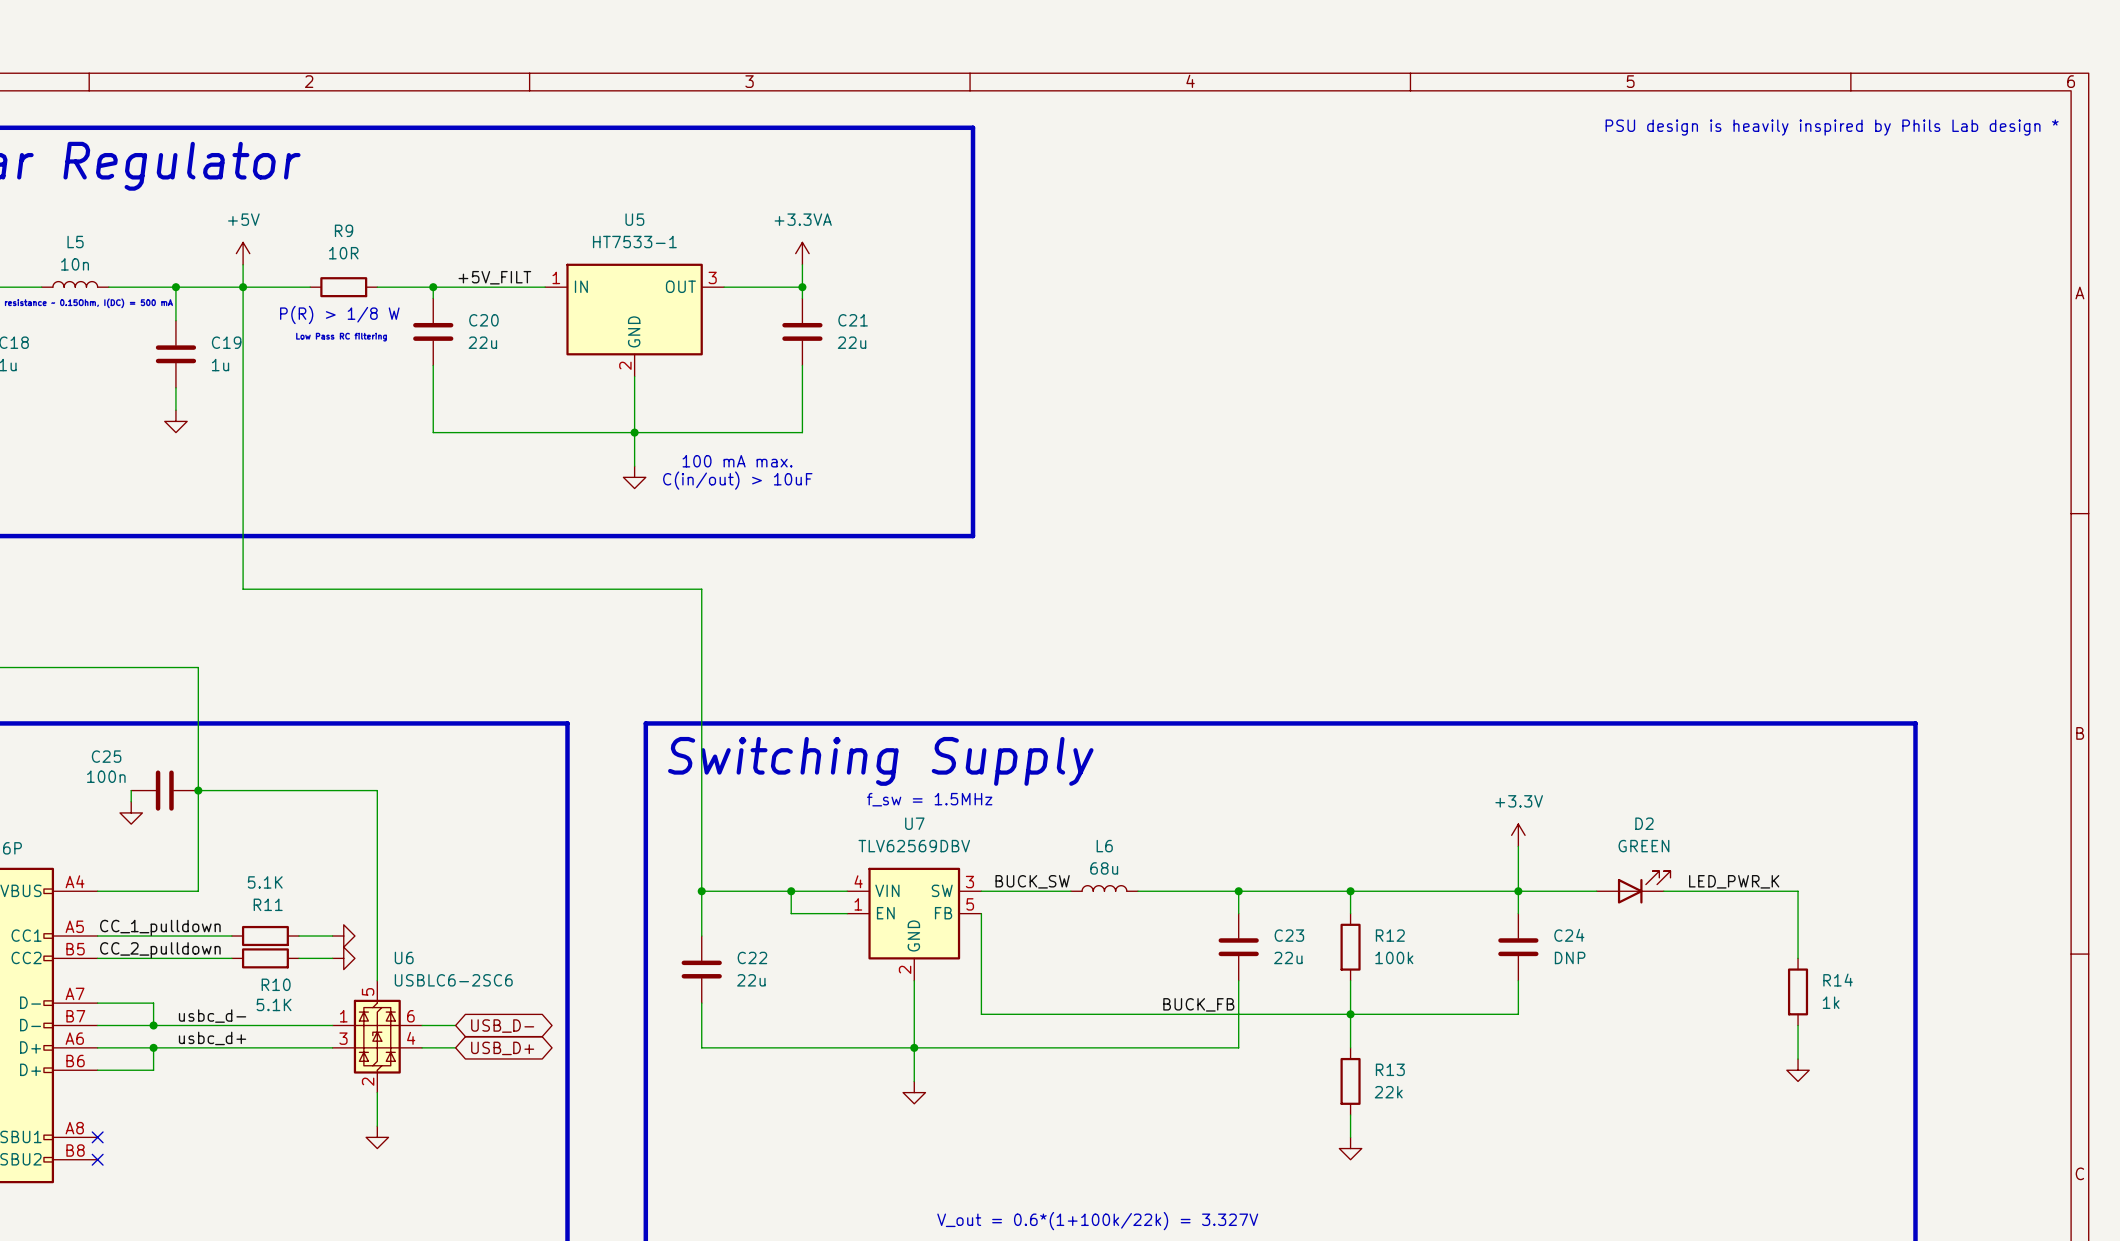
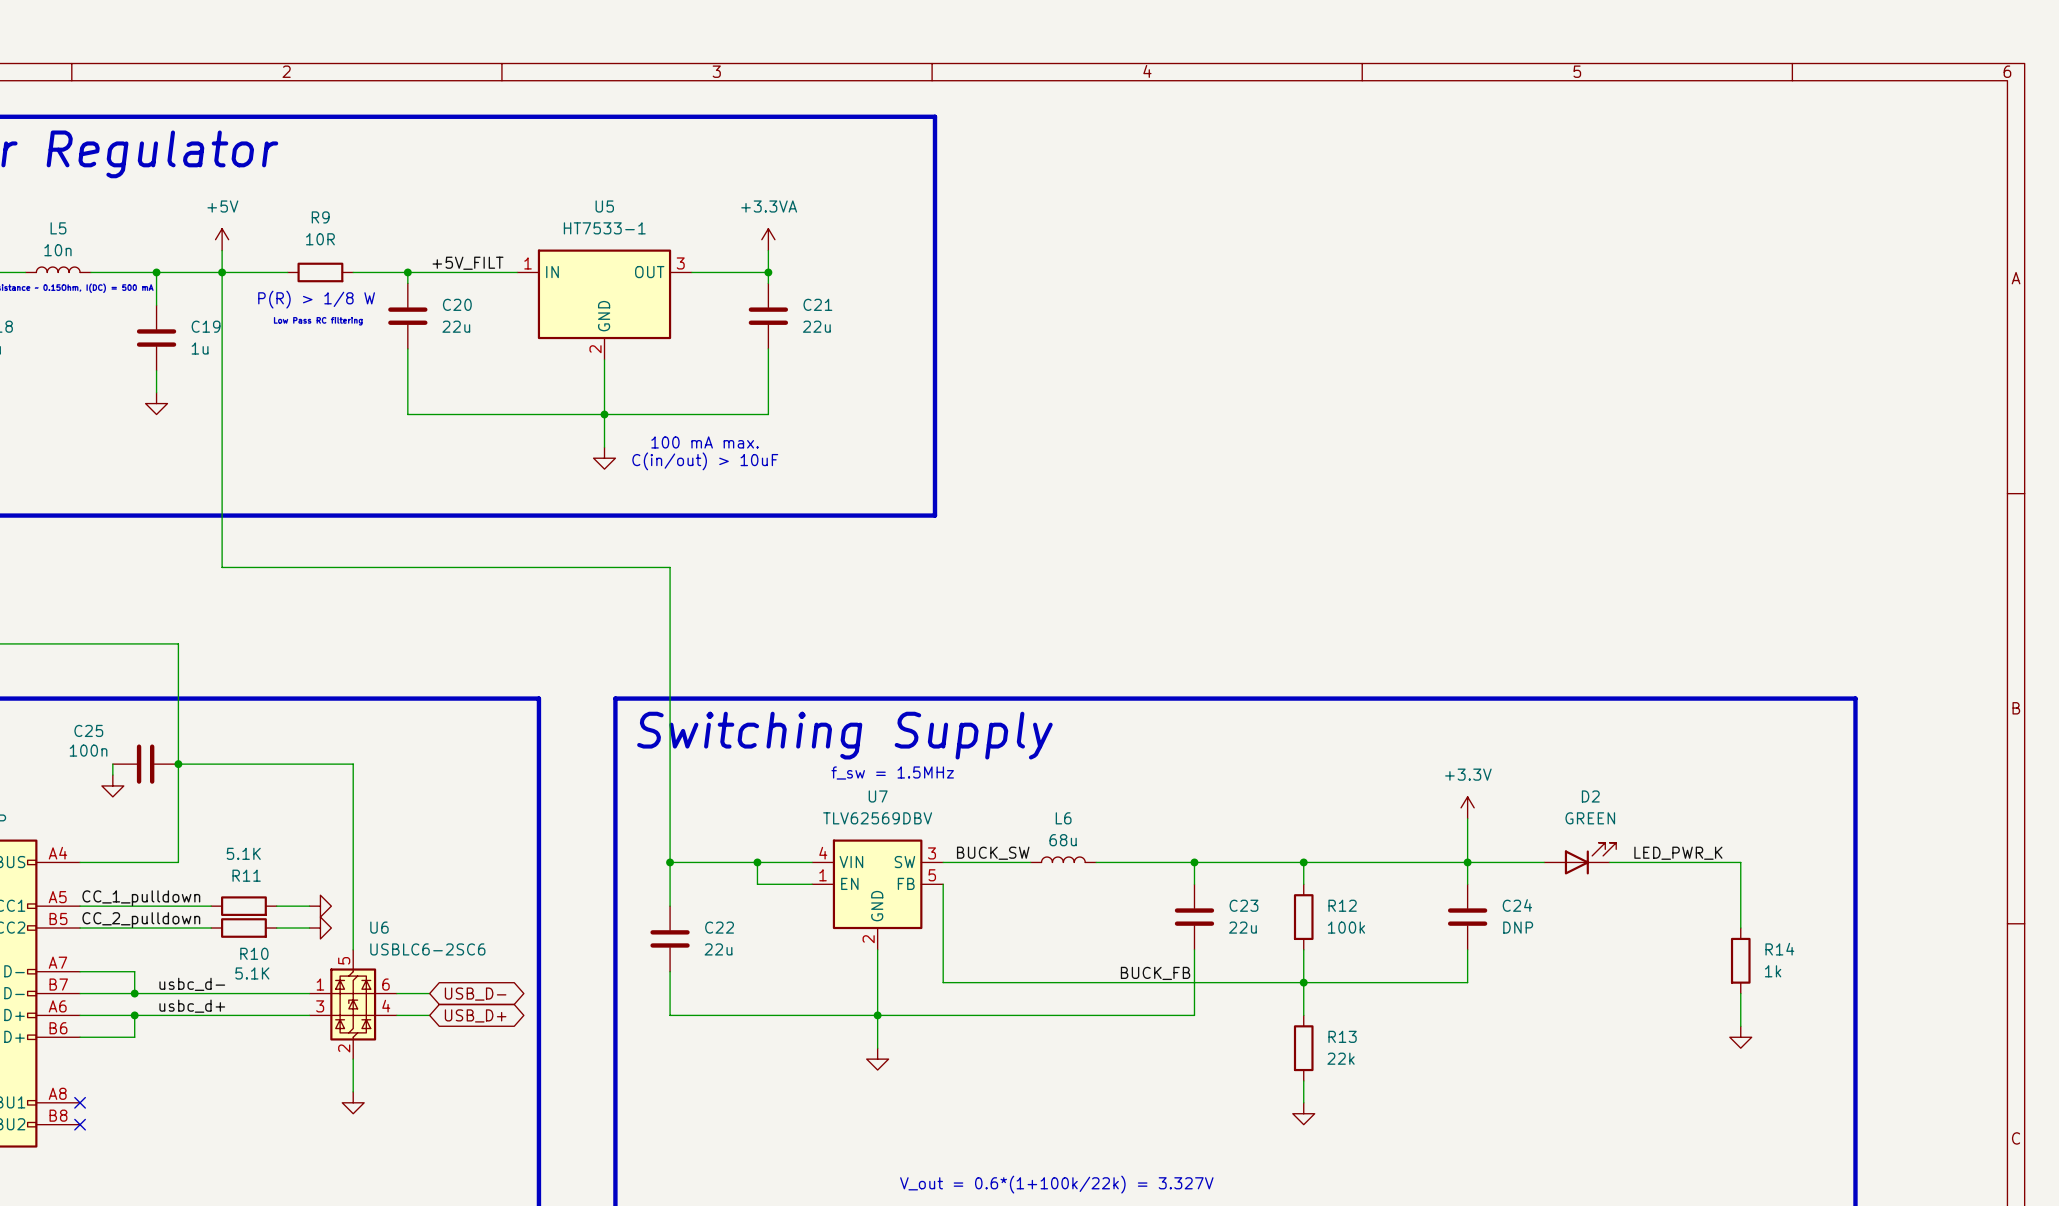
text: PSU design is heavily inspired by Phils Lab design * (1832, 127) -> none

